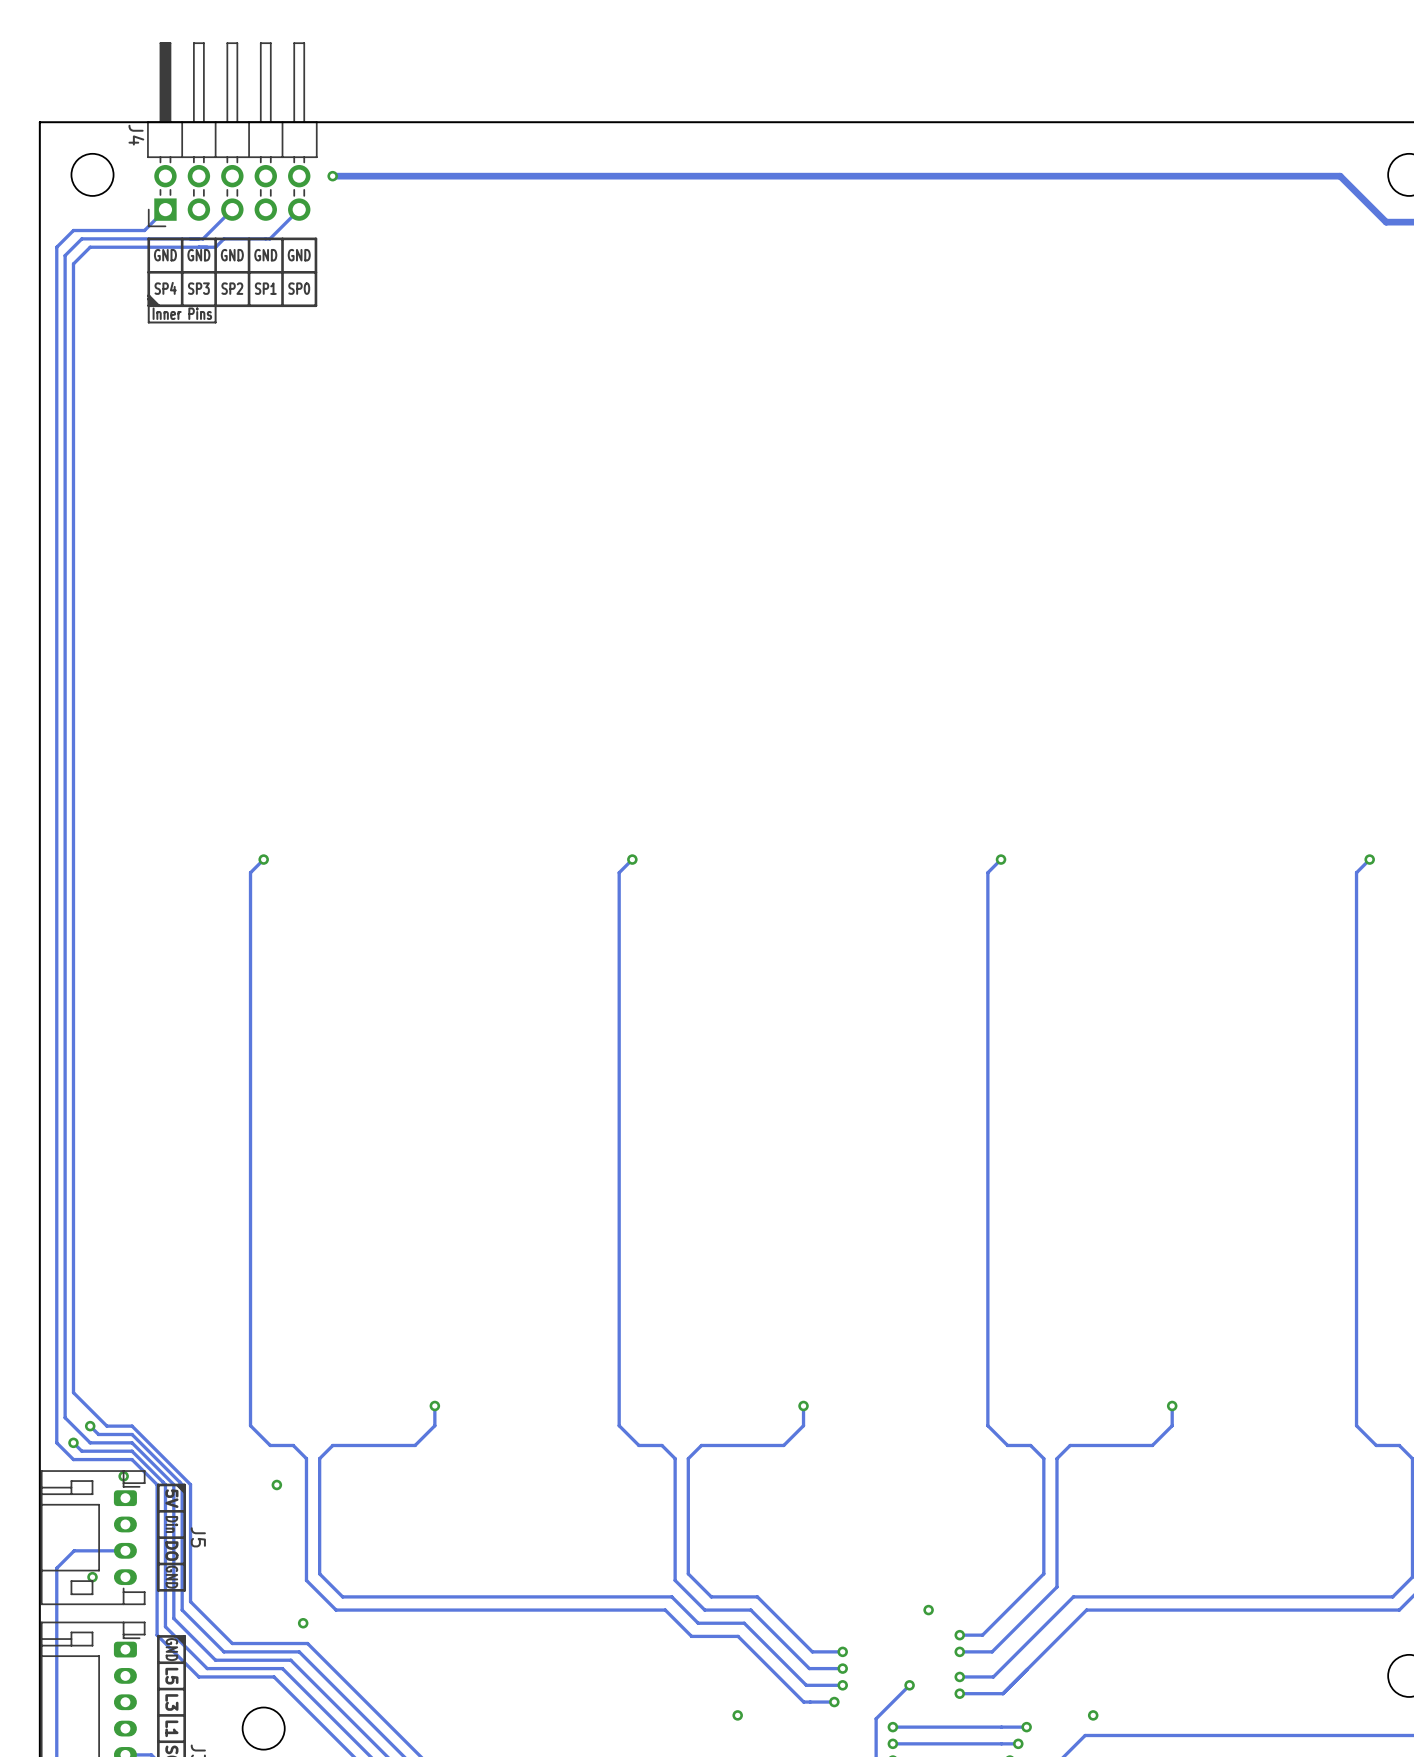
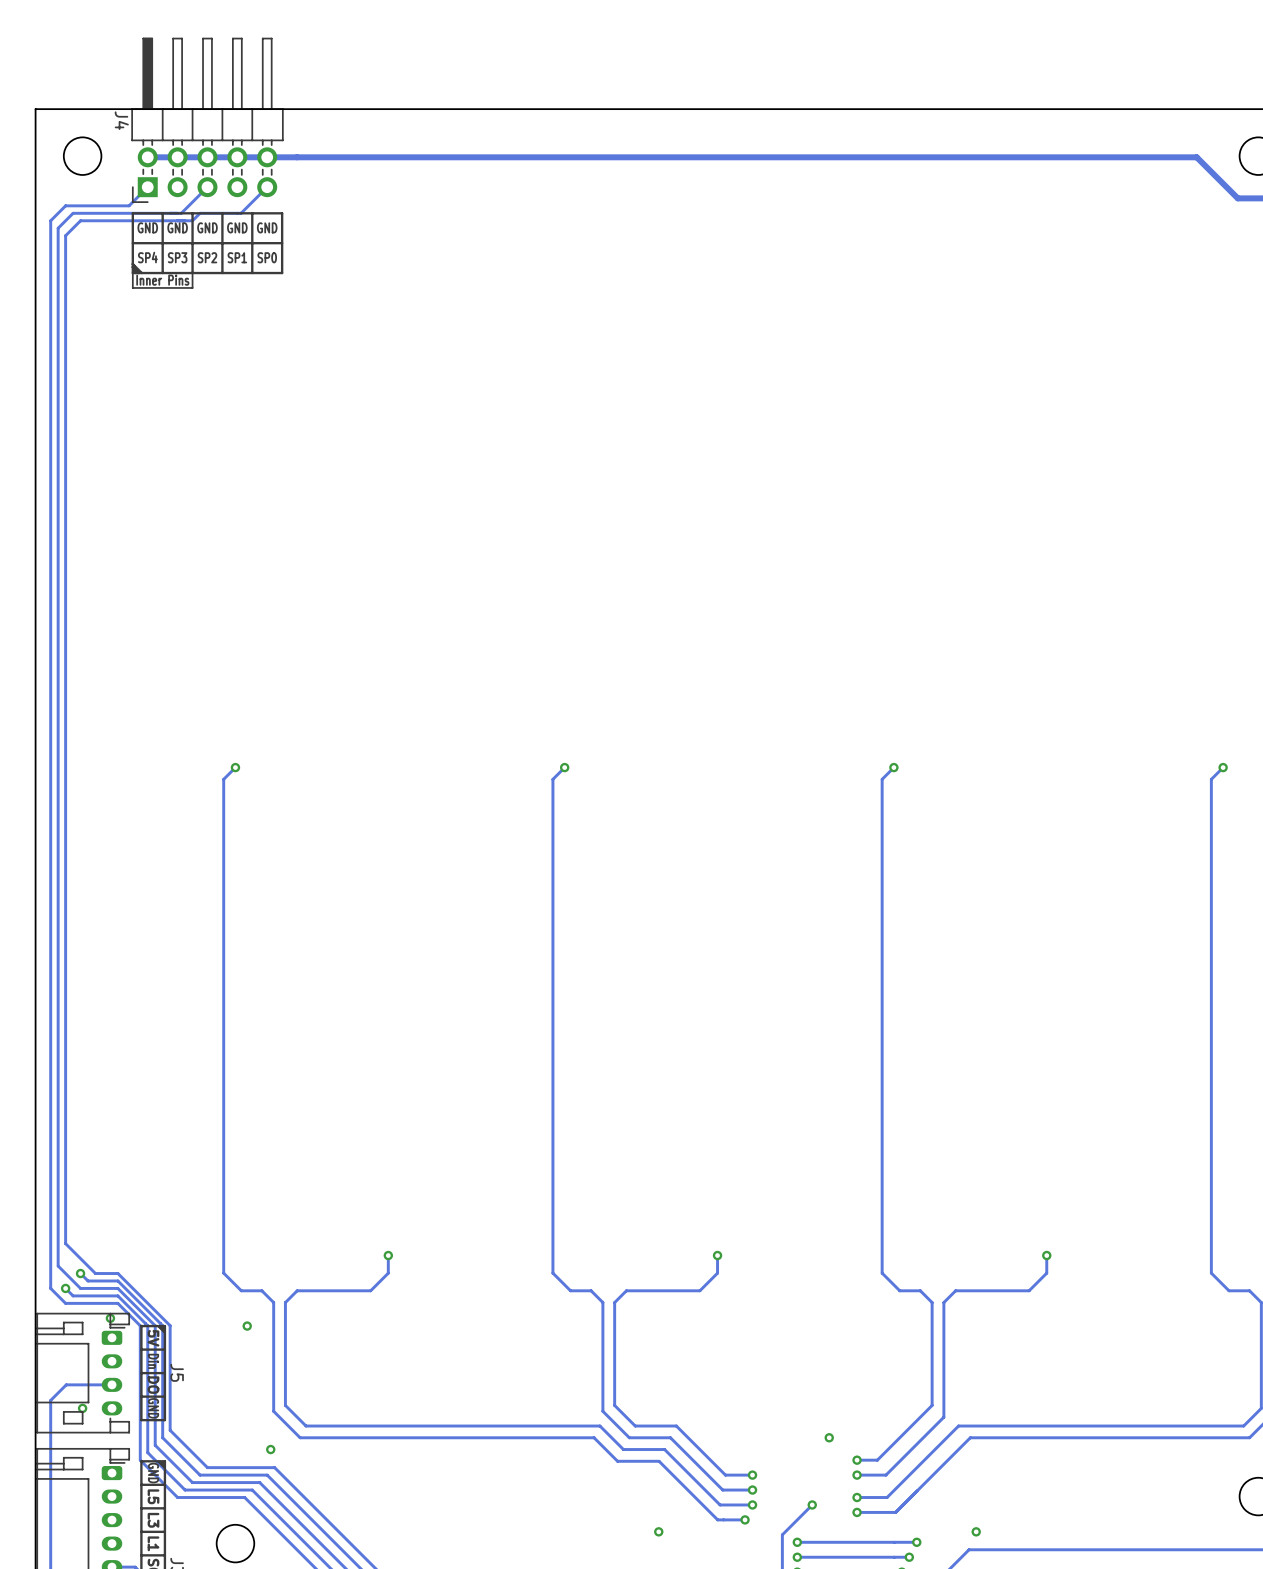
track: none -> (297, 157) (147, 157)
via: (332, 176) -> none

